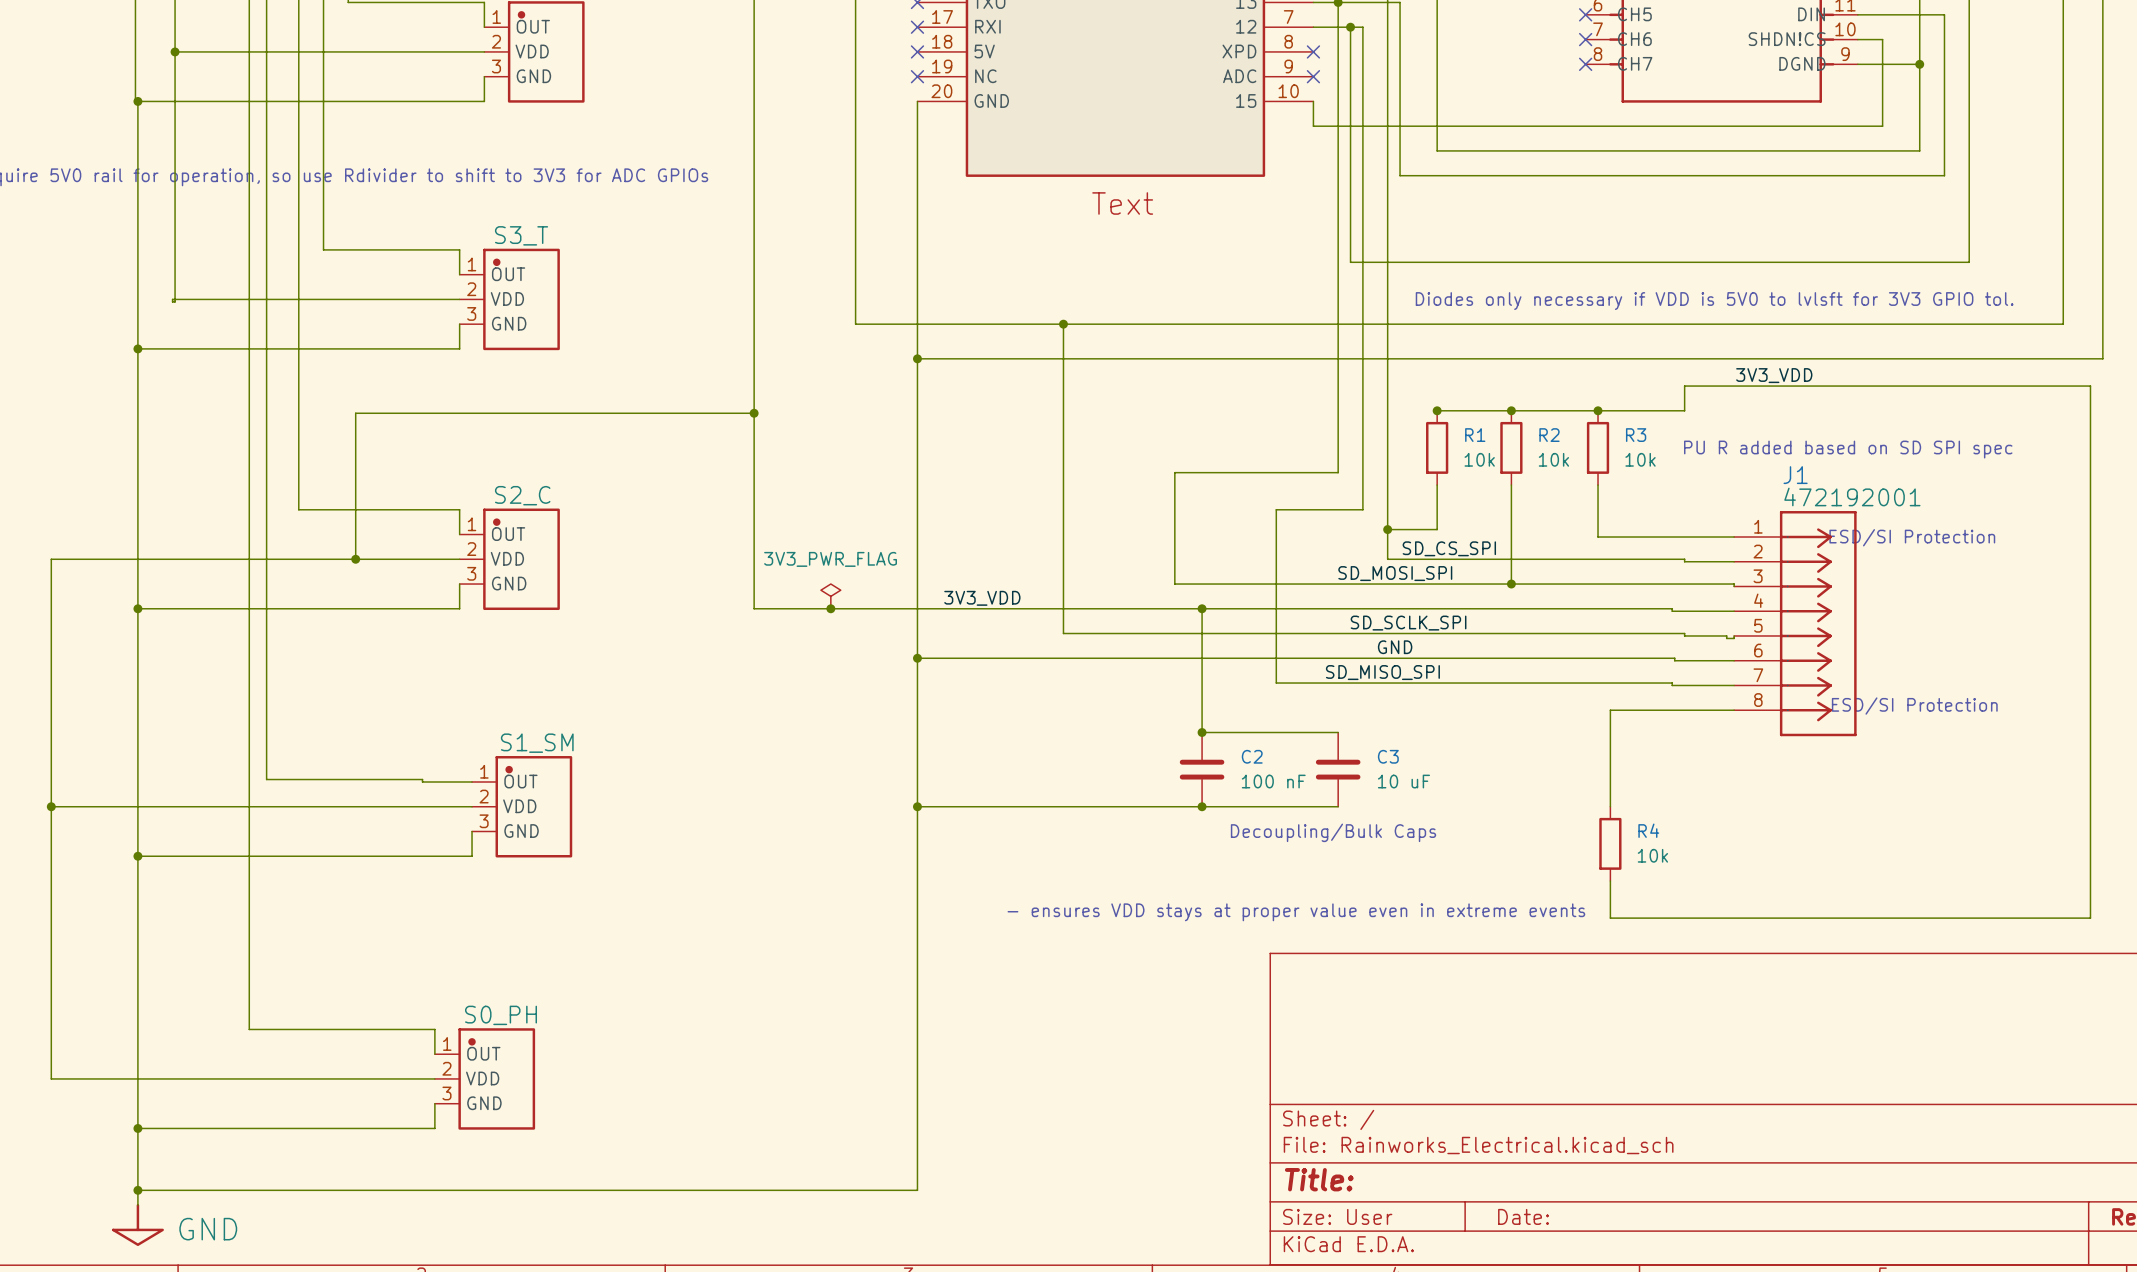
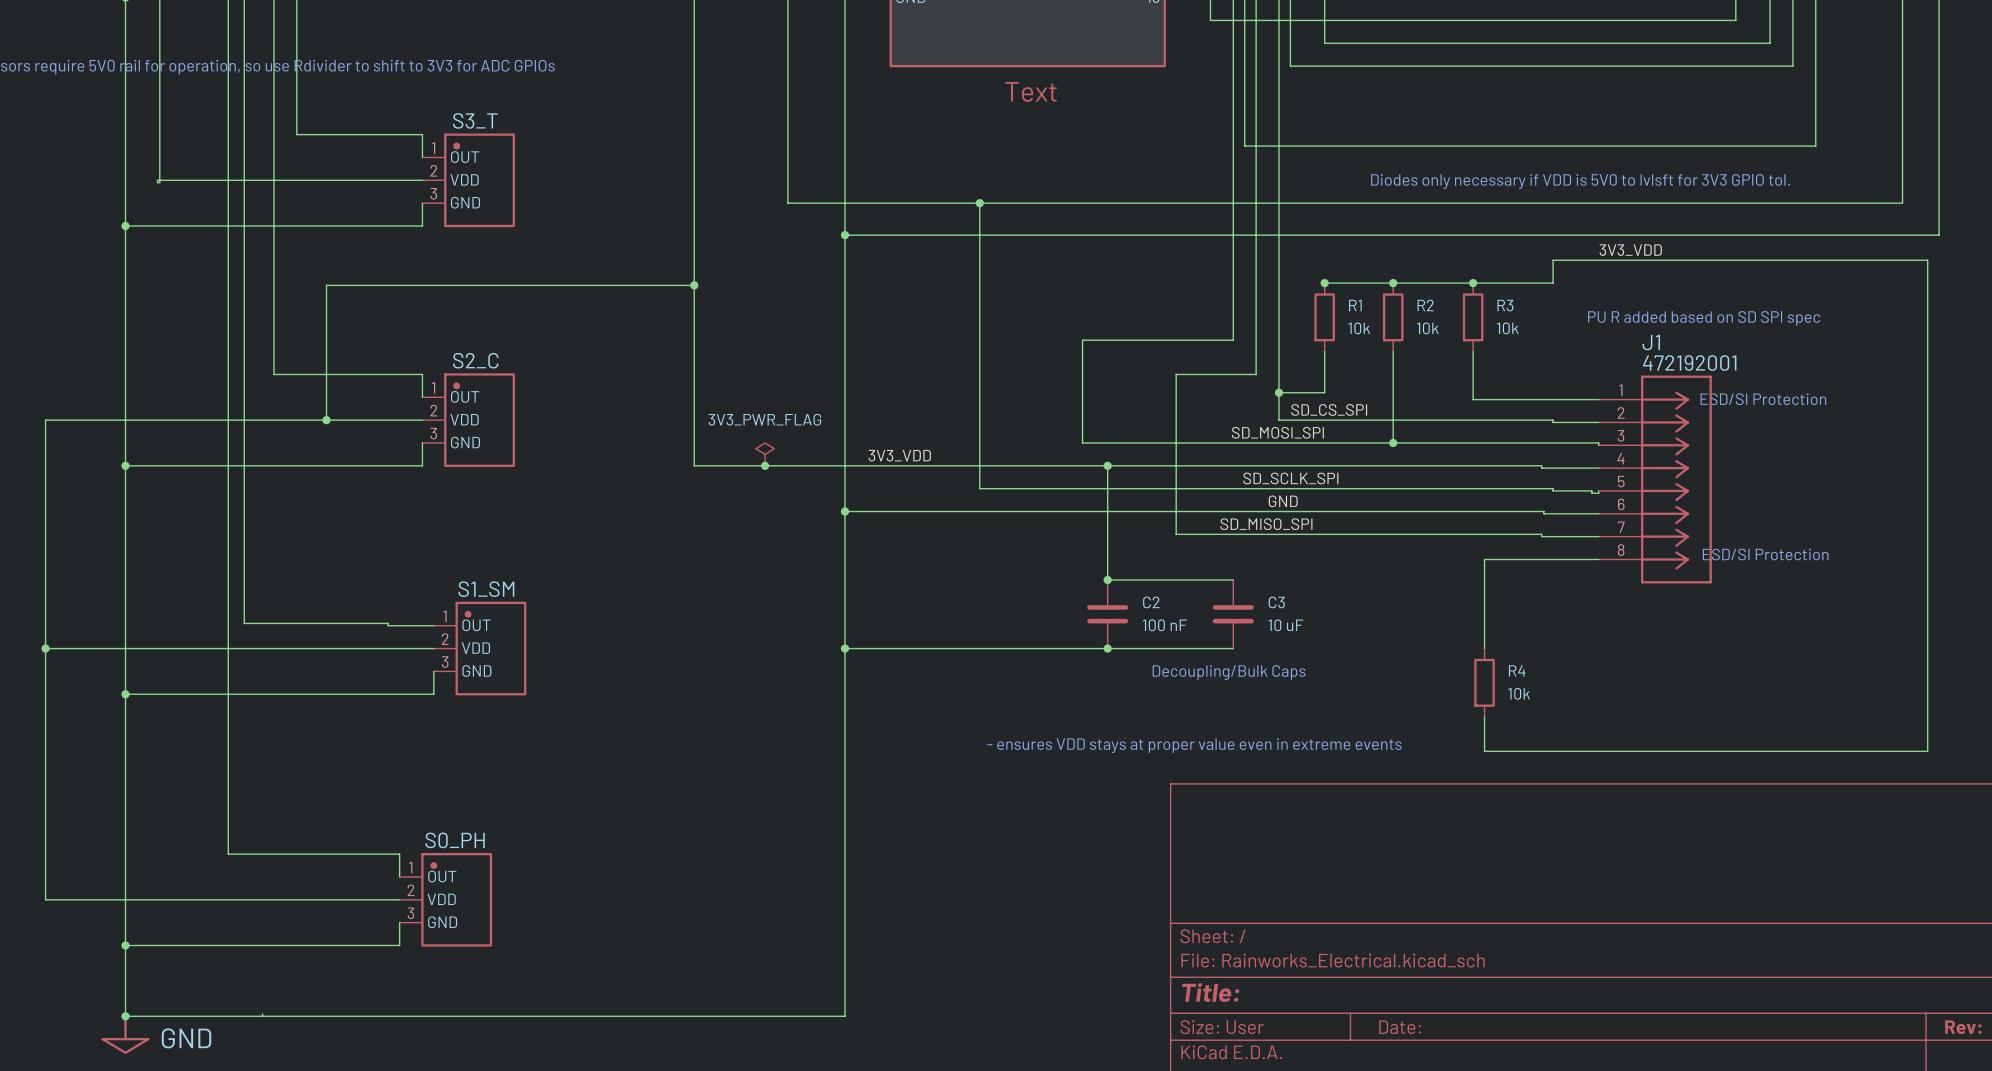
wire: (137, 1190) (917, 1190) -> (125, 1016) (845, 1016) (845, 1002)
junction position: (137, 1190) -> (125, 1016)
wire: none -> (262, 1014) (262, 1016)

